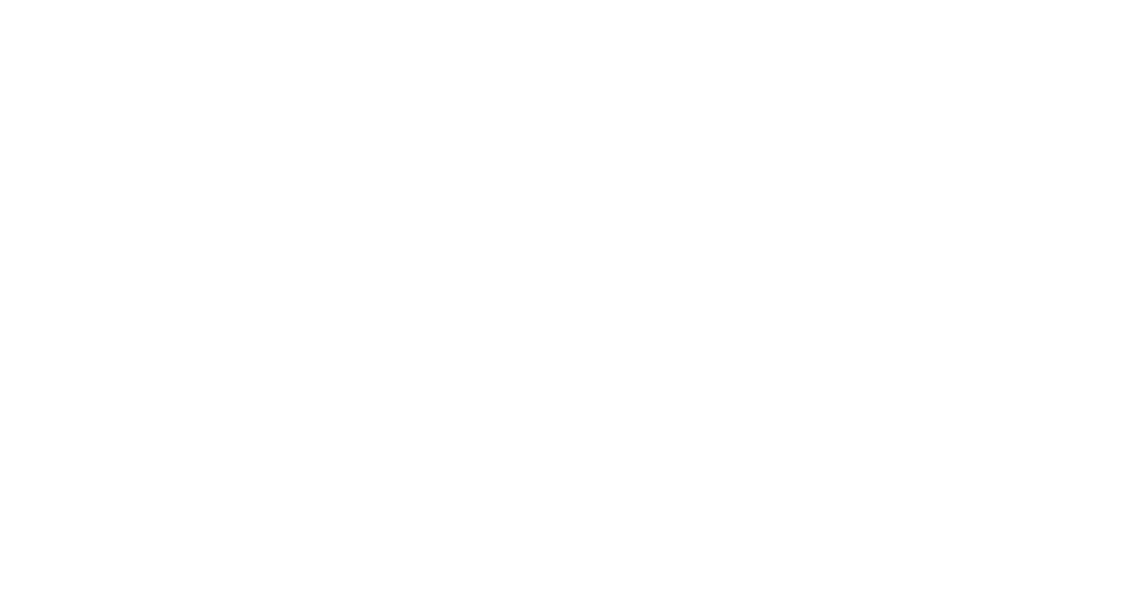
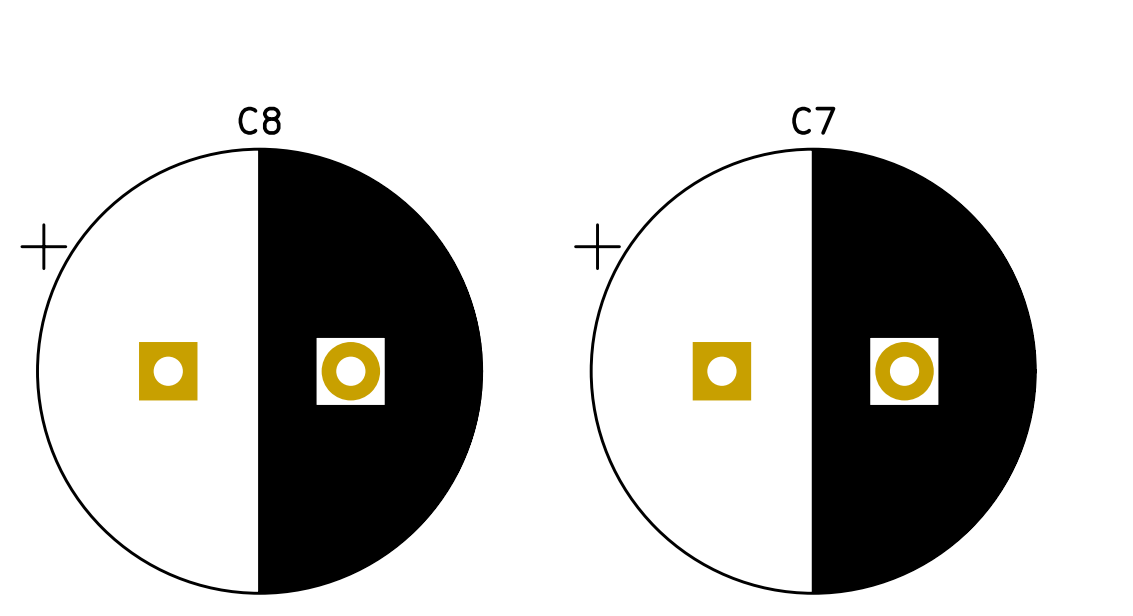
C8: none -> (251, 371)
C7: none -> (805, 371)

